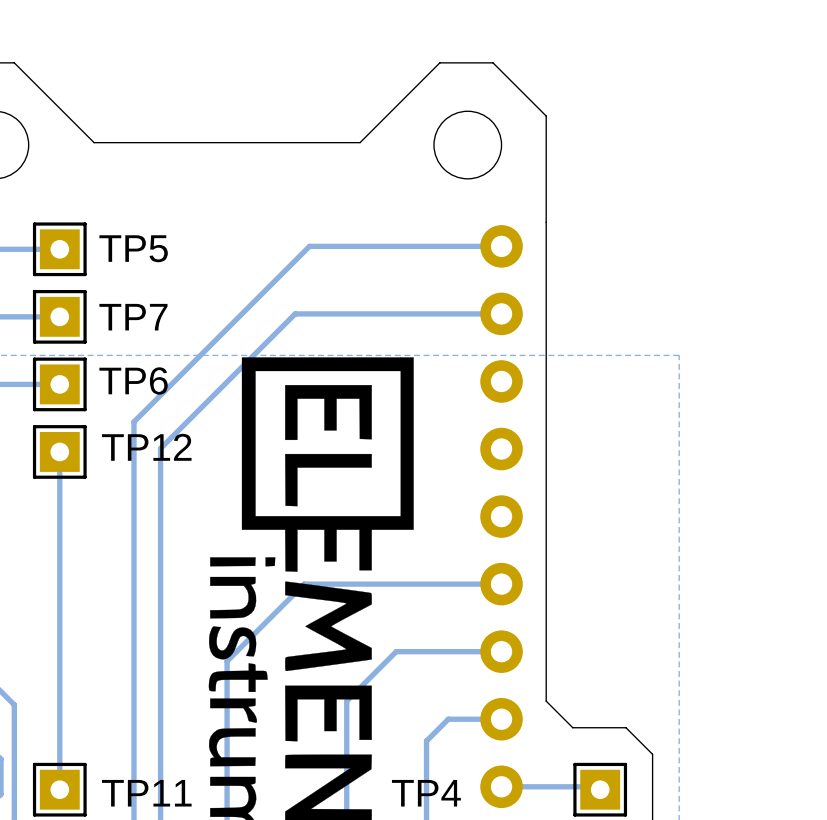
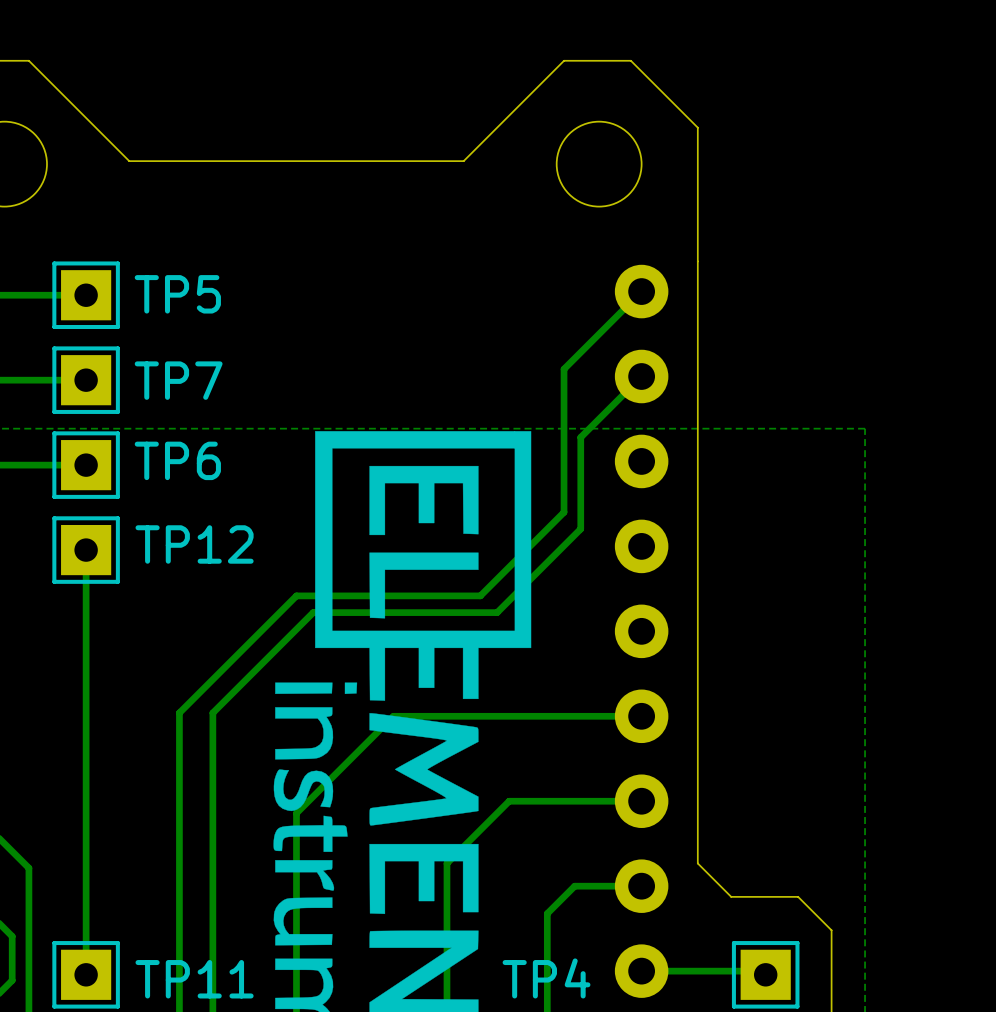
track: (501, 246) (309, 246) (133, 421) (133, 581) -> (638, 294) (564, 369) (564, 512) (480, 595) (296, 595) (179, 712)
track: (501, 313) (295, 313) (160, 448) (160, 581) -> (641, 376) (580, 437) (580, 529) (497, 612) (313, 612) (212, 712)

